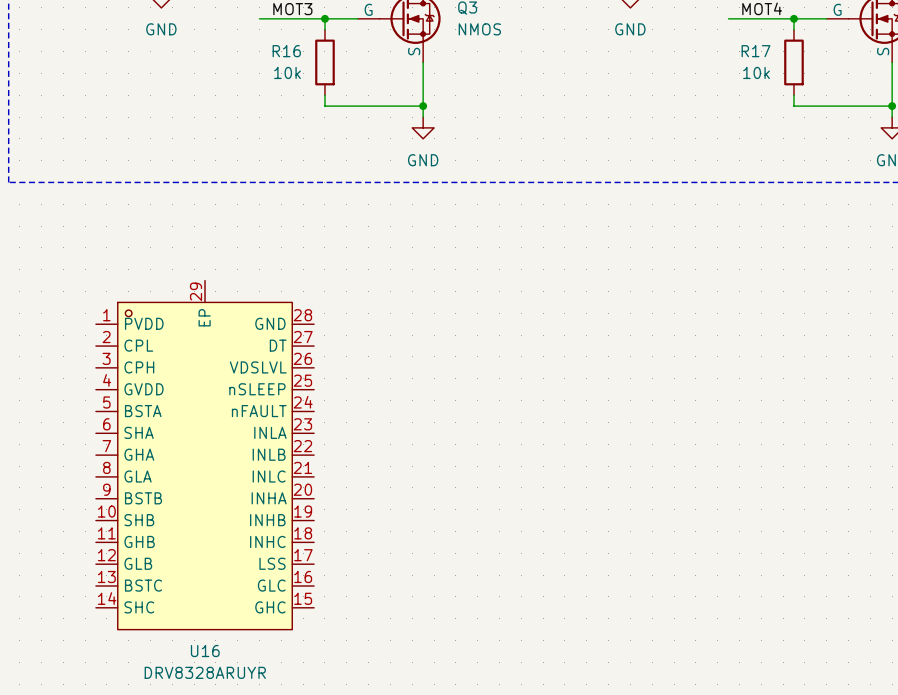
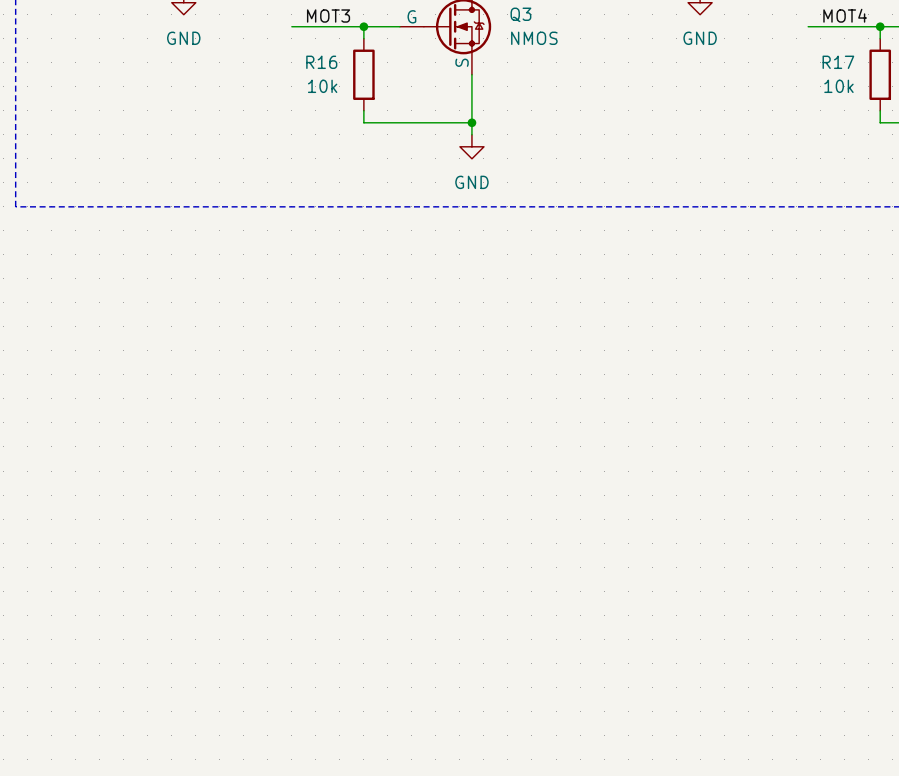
U16: DRV8328ARUYR (205, 455) -> none

